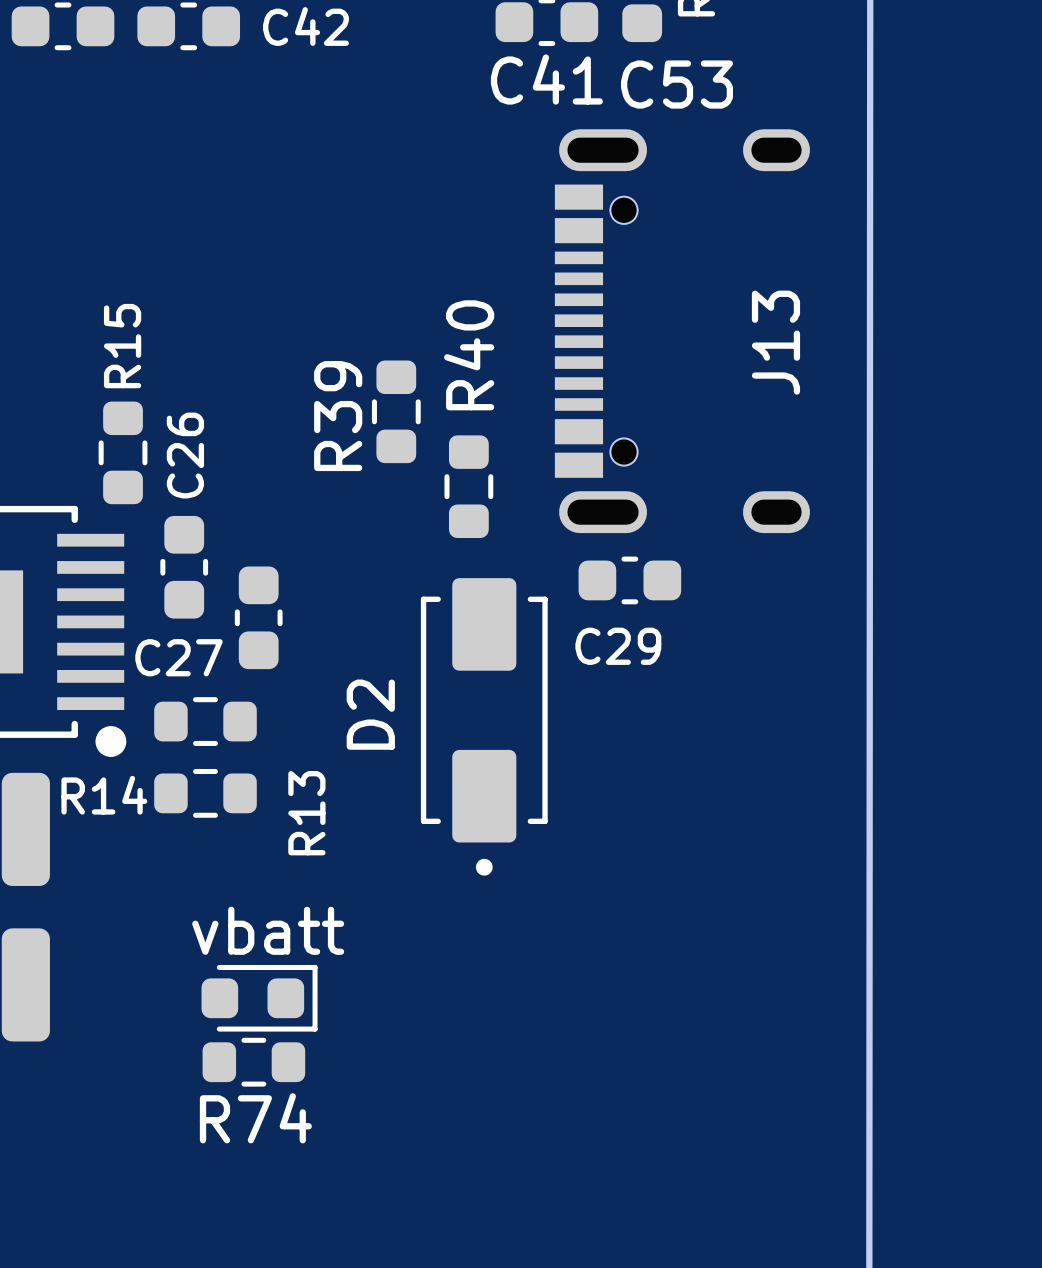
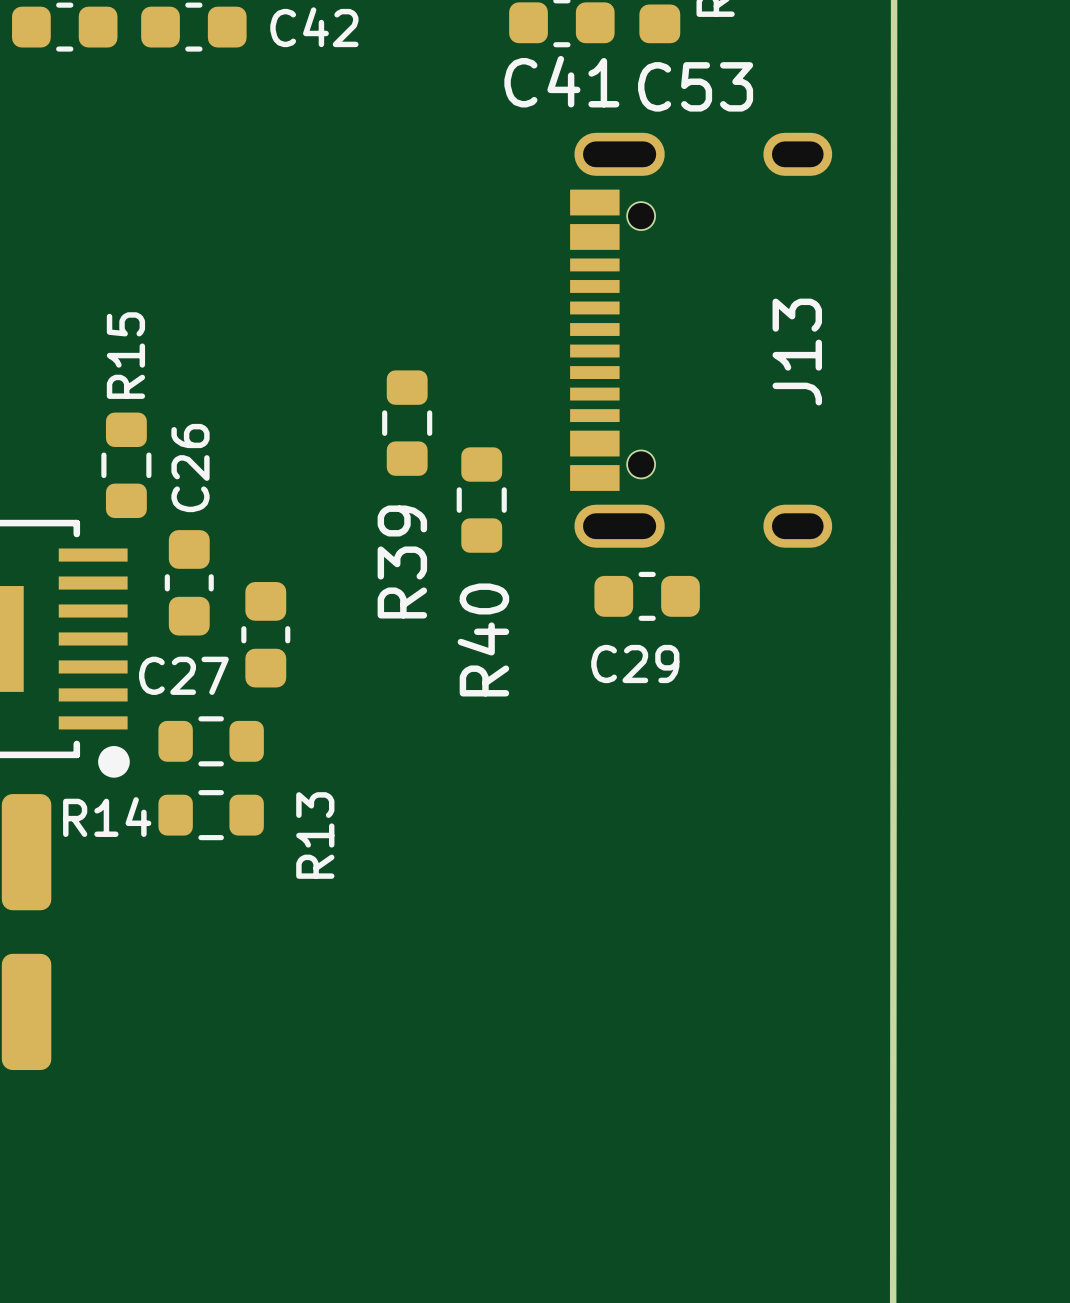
R40 name position: R40 (469, 355) -> R40 (483, 639)
R39 name position: R39 (338, 416) -> R39 (402, 561)
D2: (484, 726) -> none
vbatt: (259, 998) -> none
R74: (253, 1062) -> none

